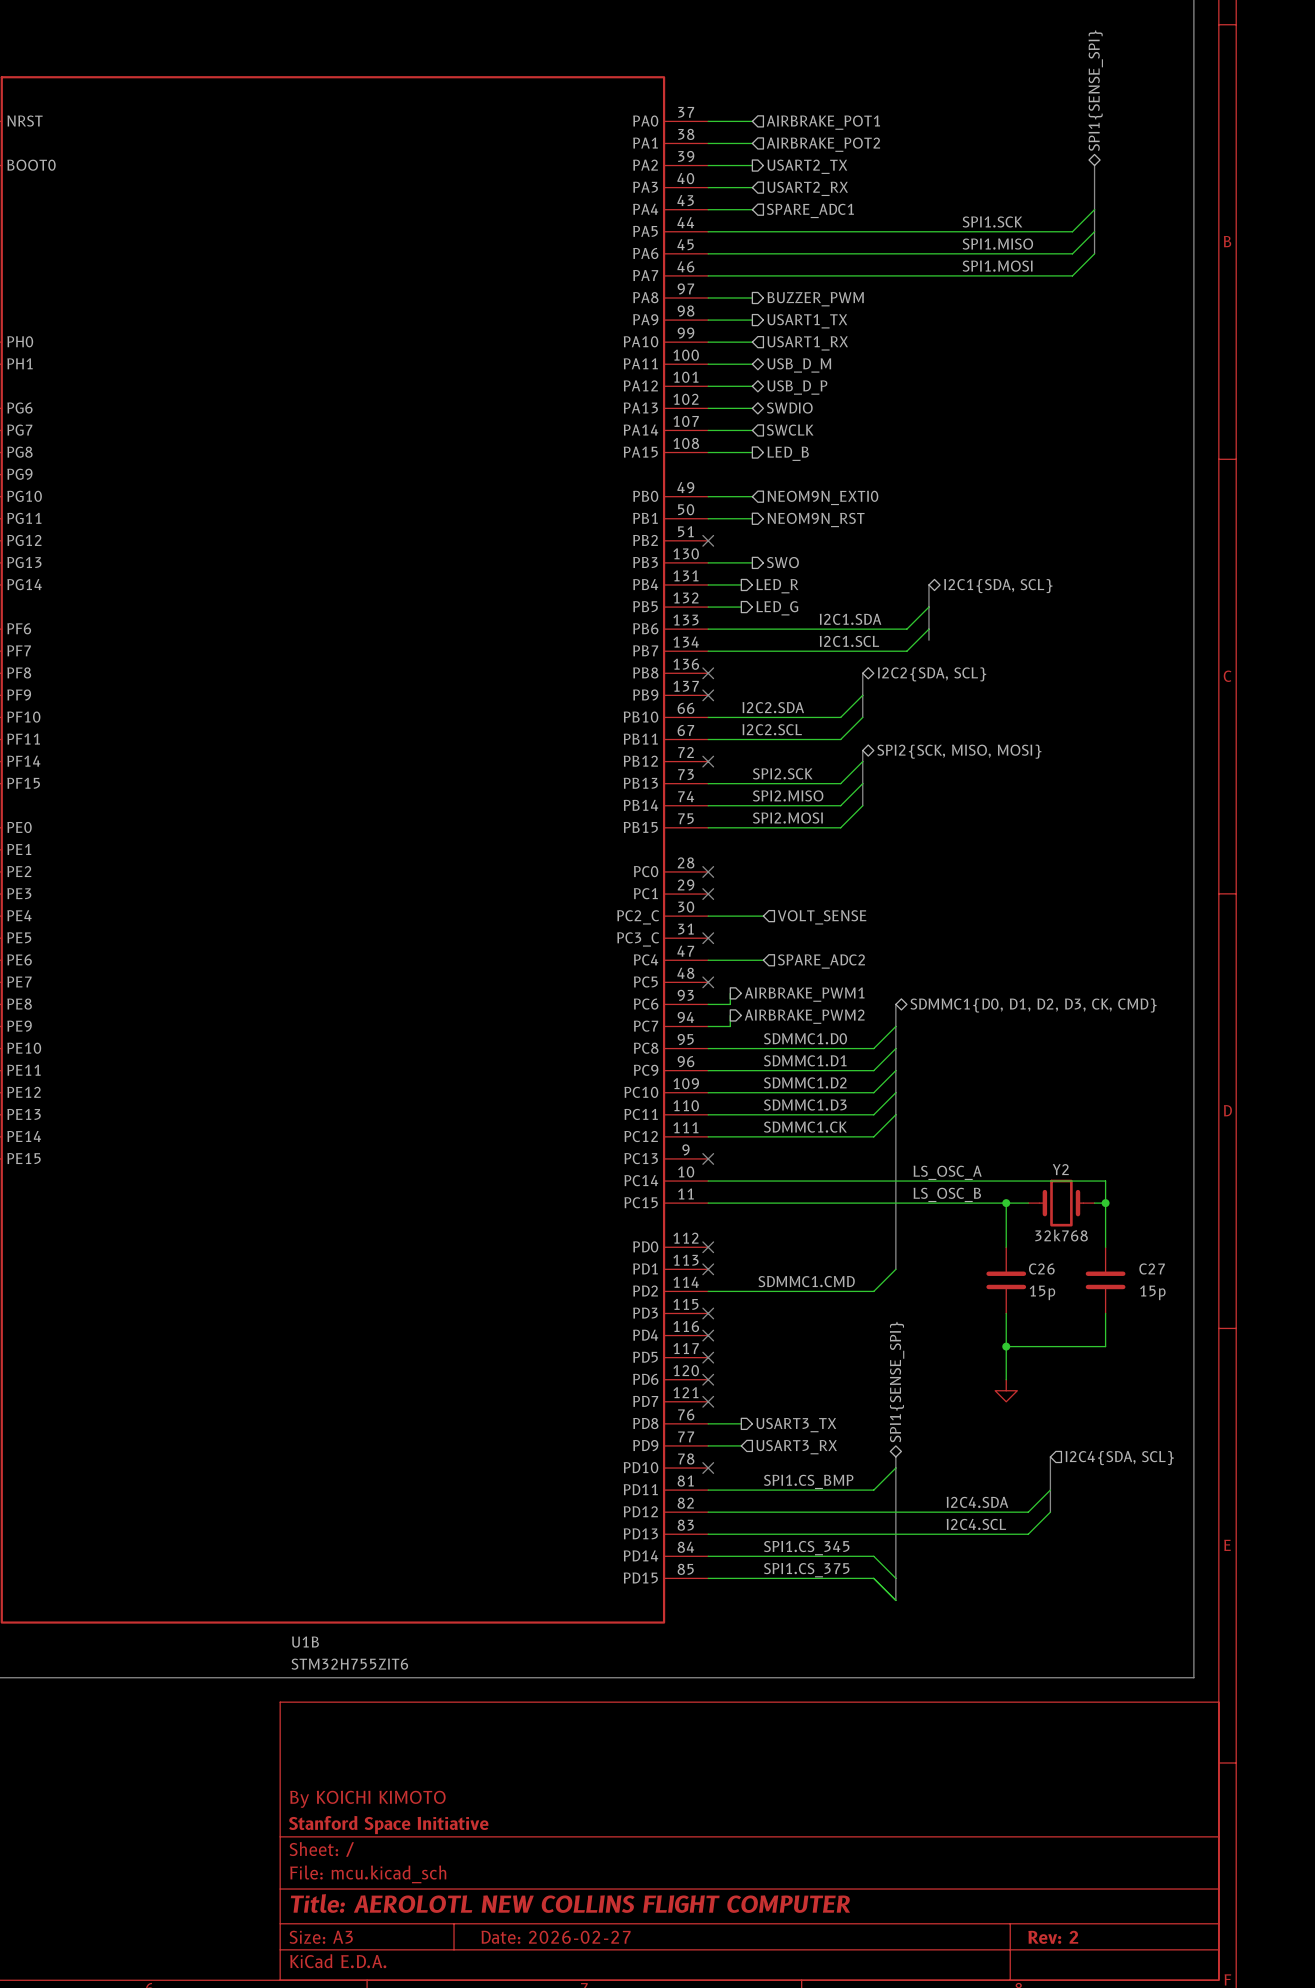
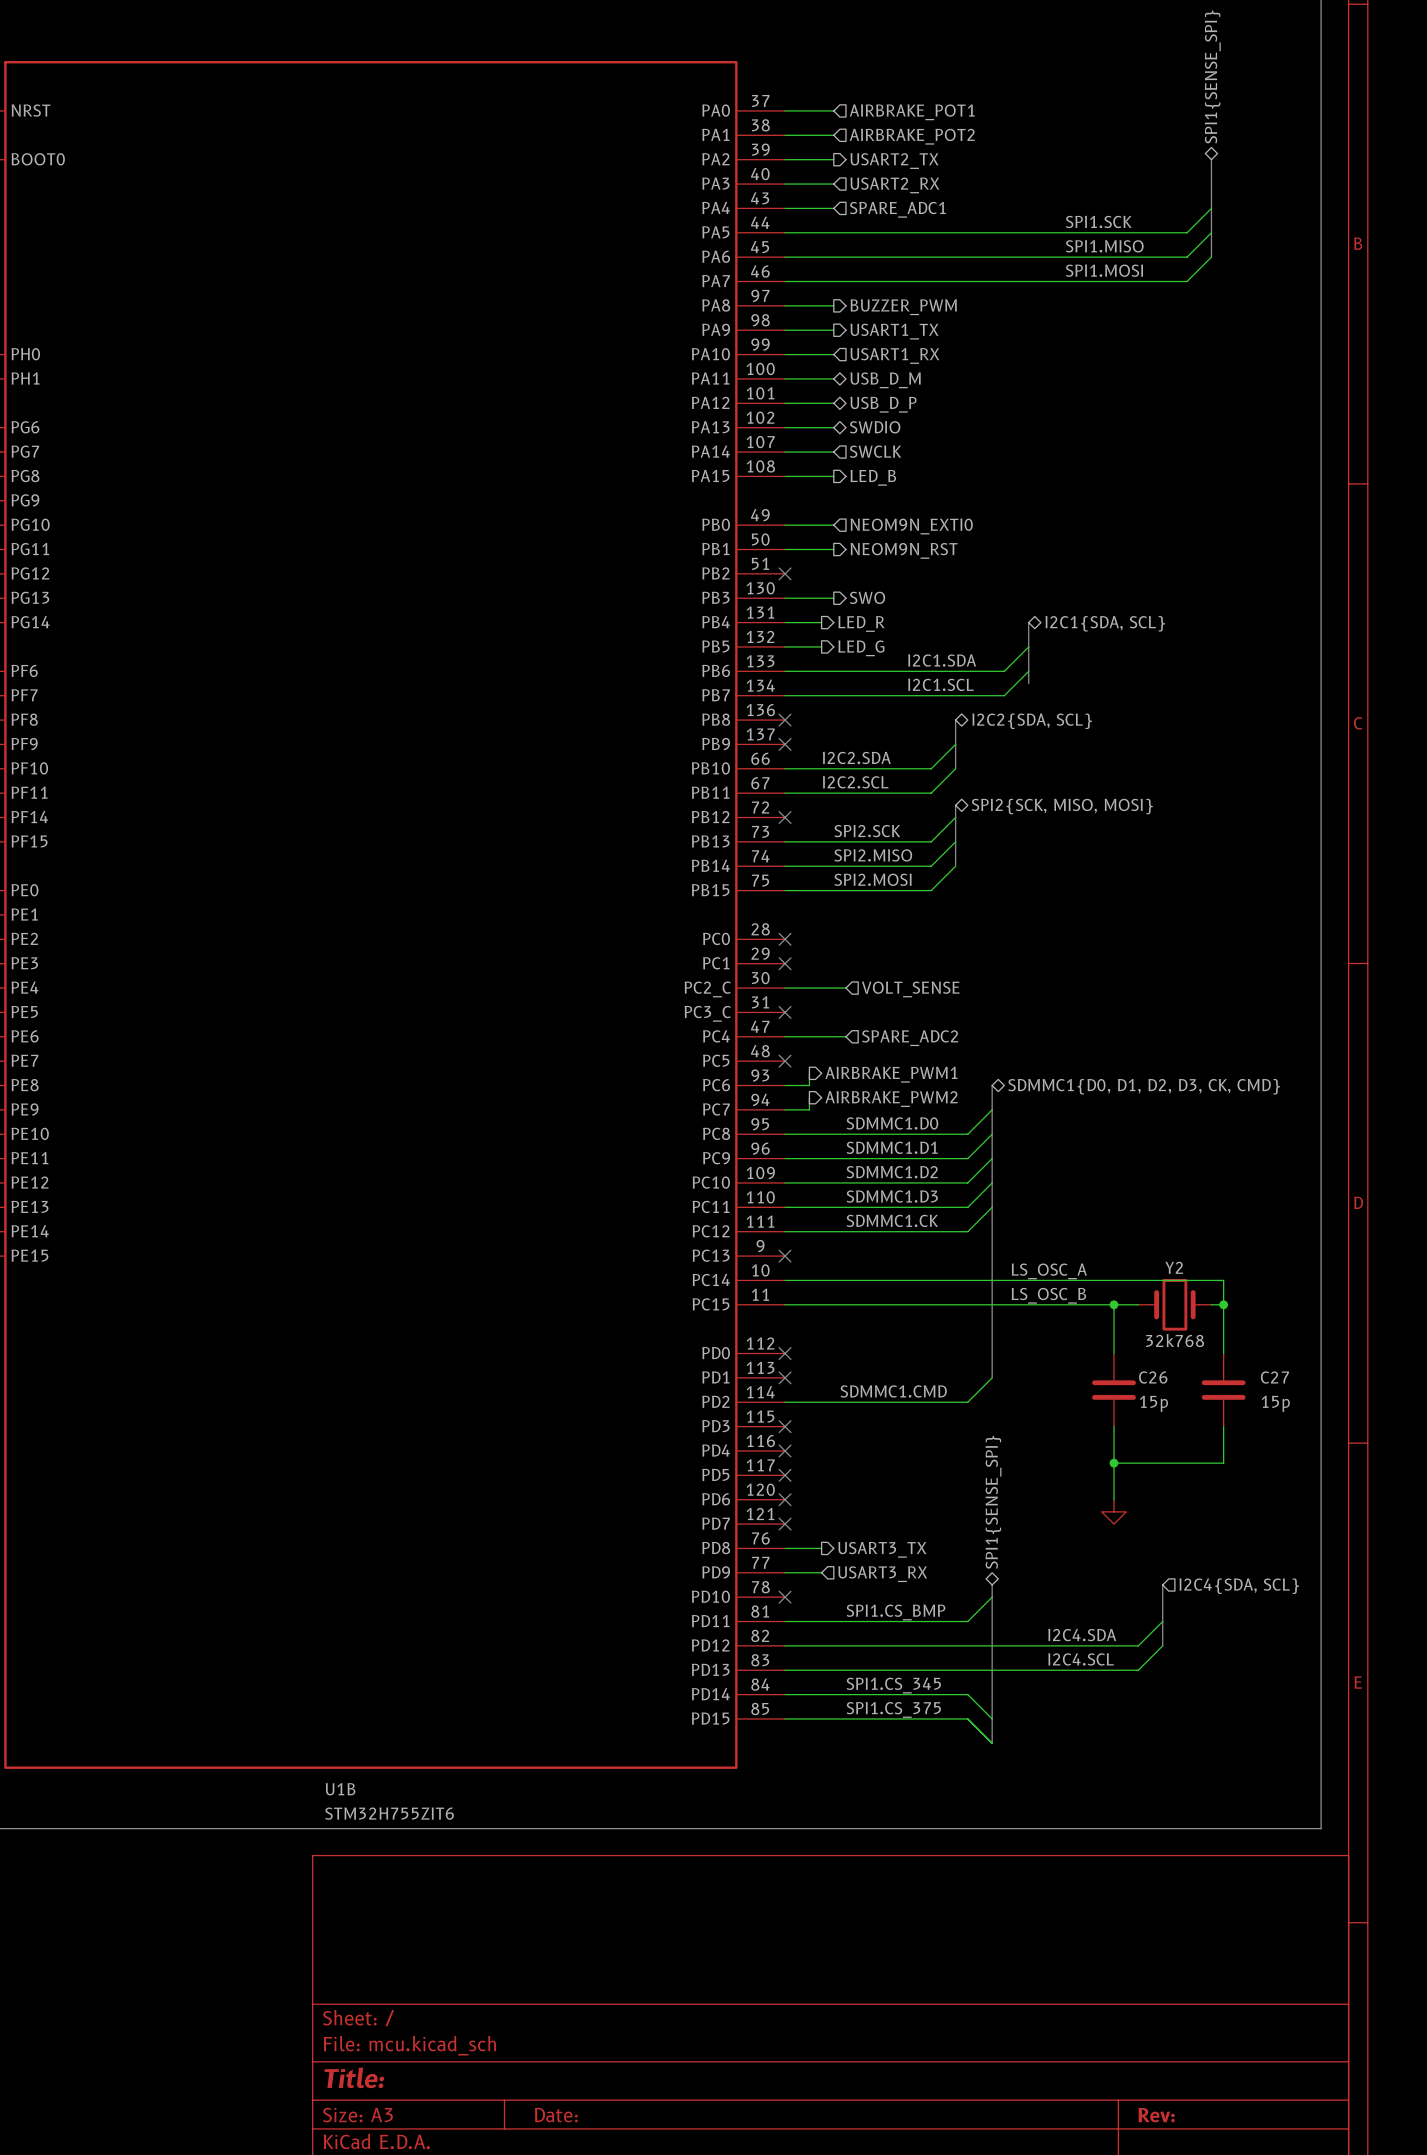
title block: By KOICHI KIMOTO (367, 1799) -> none
title block: Stanford Space Initiative (388, 1825) -> none
title block: Title: AEROLOTL NEW COLLINS FLIGHT COMPUTER (570, 1903) -> Title: (354, 2077)
title block: Date: 2026-02-27 (556, 1937) -> Date: (556, 2115)
title block: Rev: 2 (1053, 1937) -> Rev: (1156, 2115)

